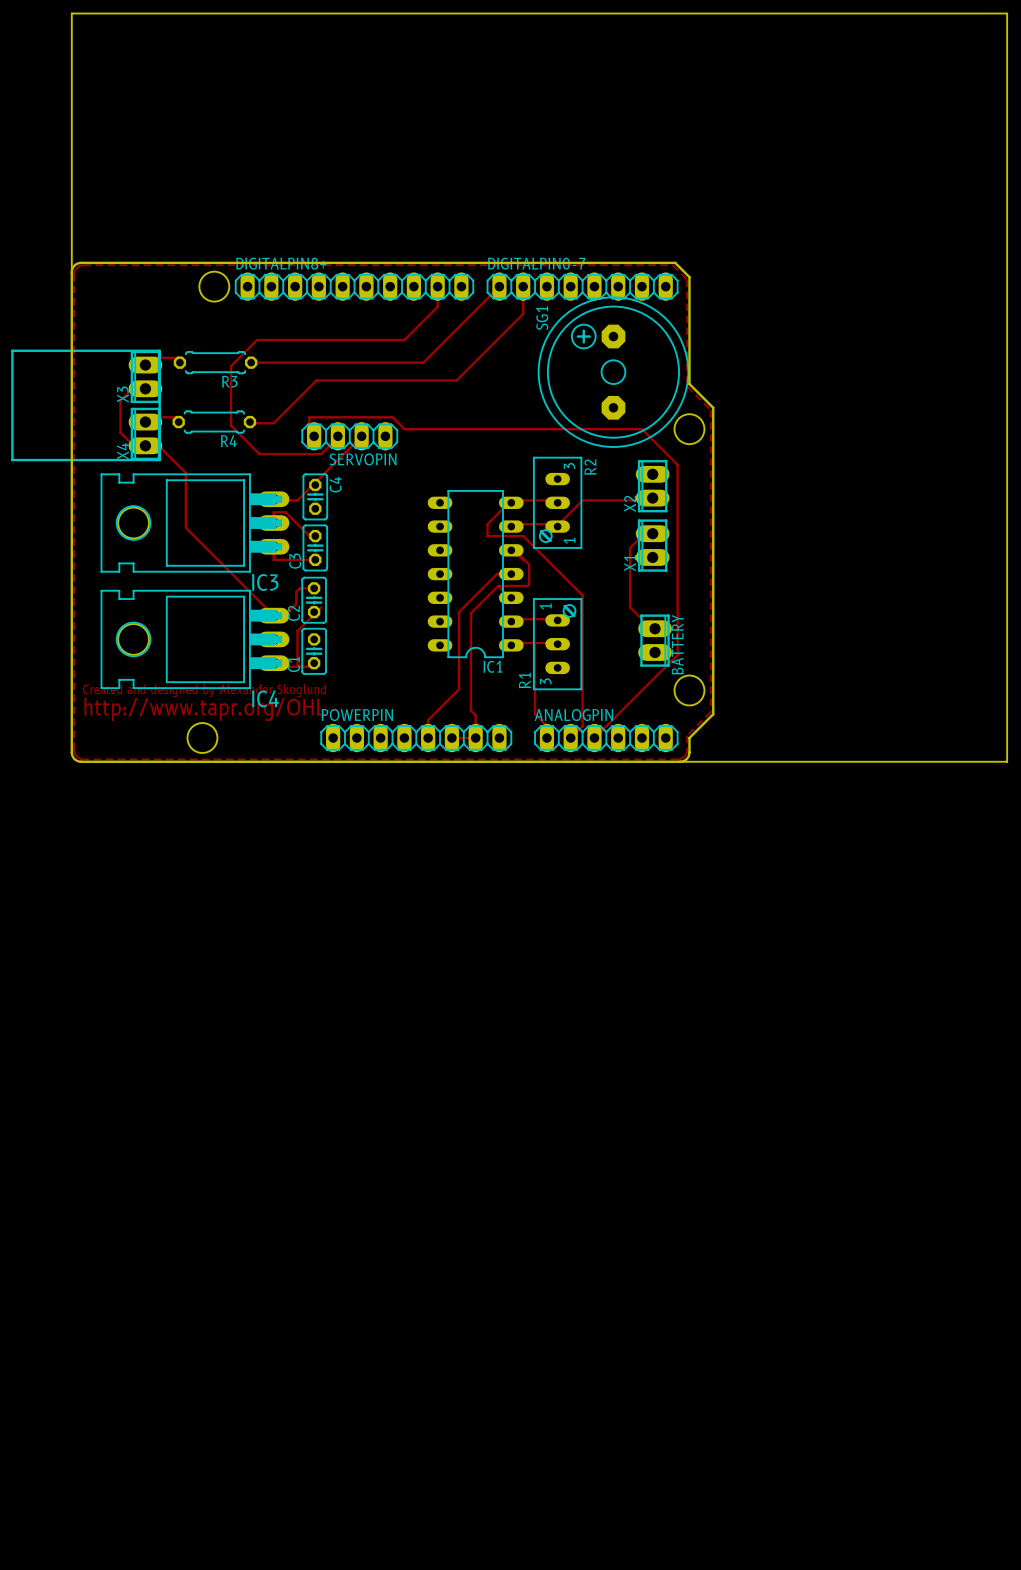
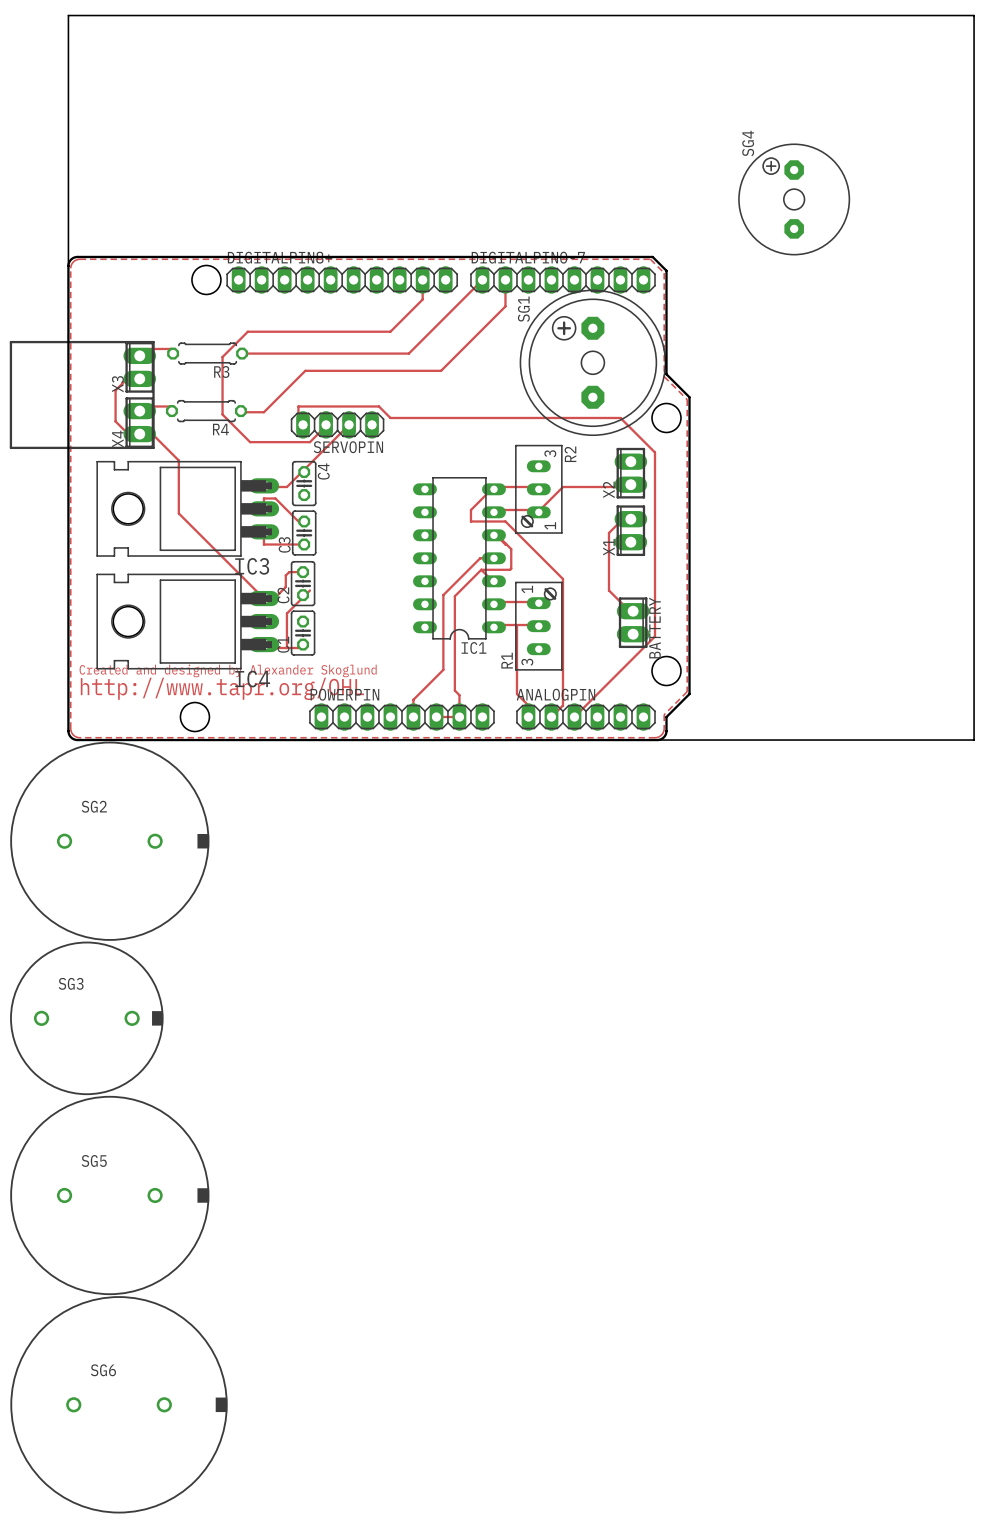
SG4: none -> (794, 199)
SG2: none -> (109, 841)
SG3: none -> (86, 1018)
SG5: none -> (109, 1195)
SG6: none -> (119, 1404)

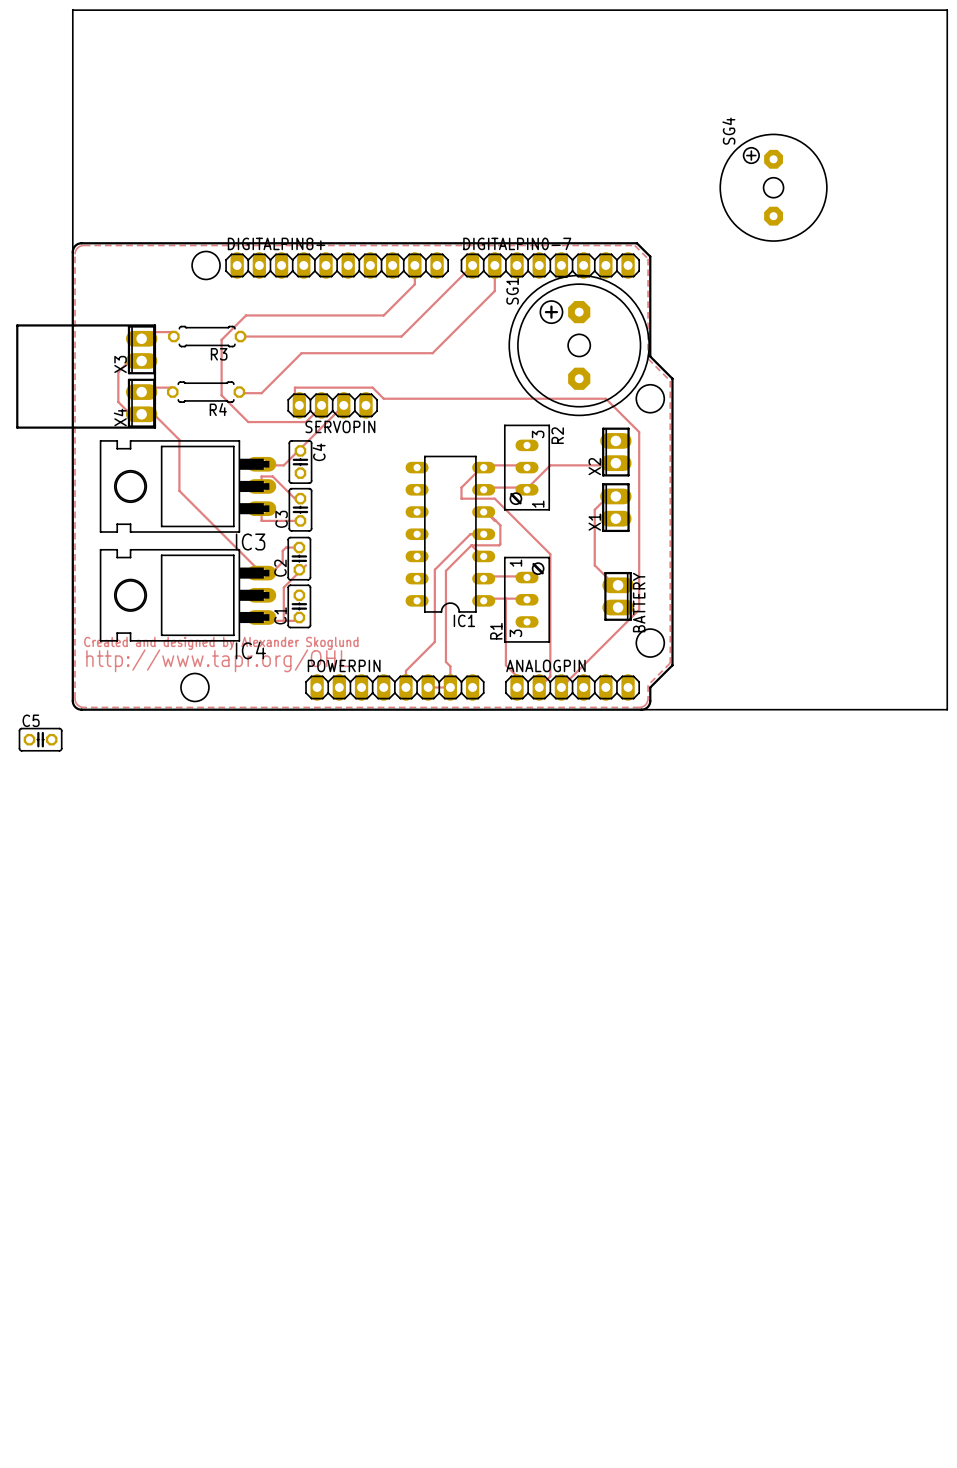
C5: none -> (40, 739)
SG2: (109, 841) -> none
SG3: (86, 1018) -> none
SG5: (109, 1195) -> none
SG6: (119, 1404) -> none

